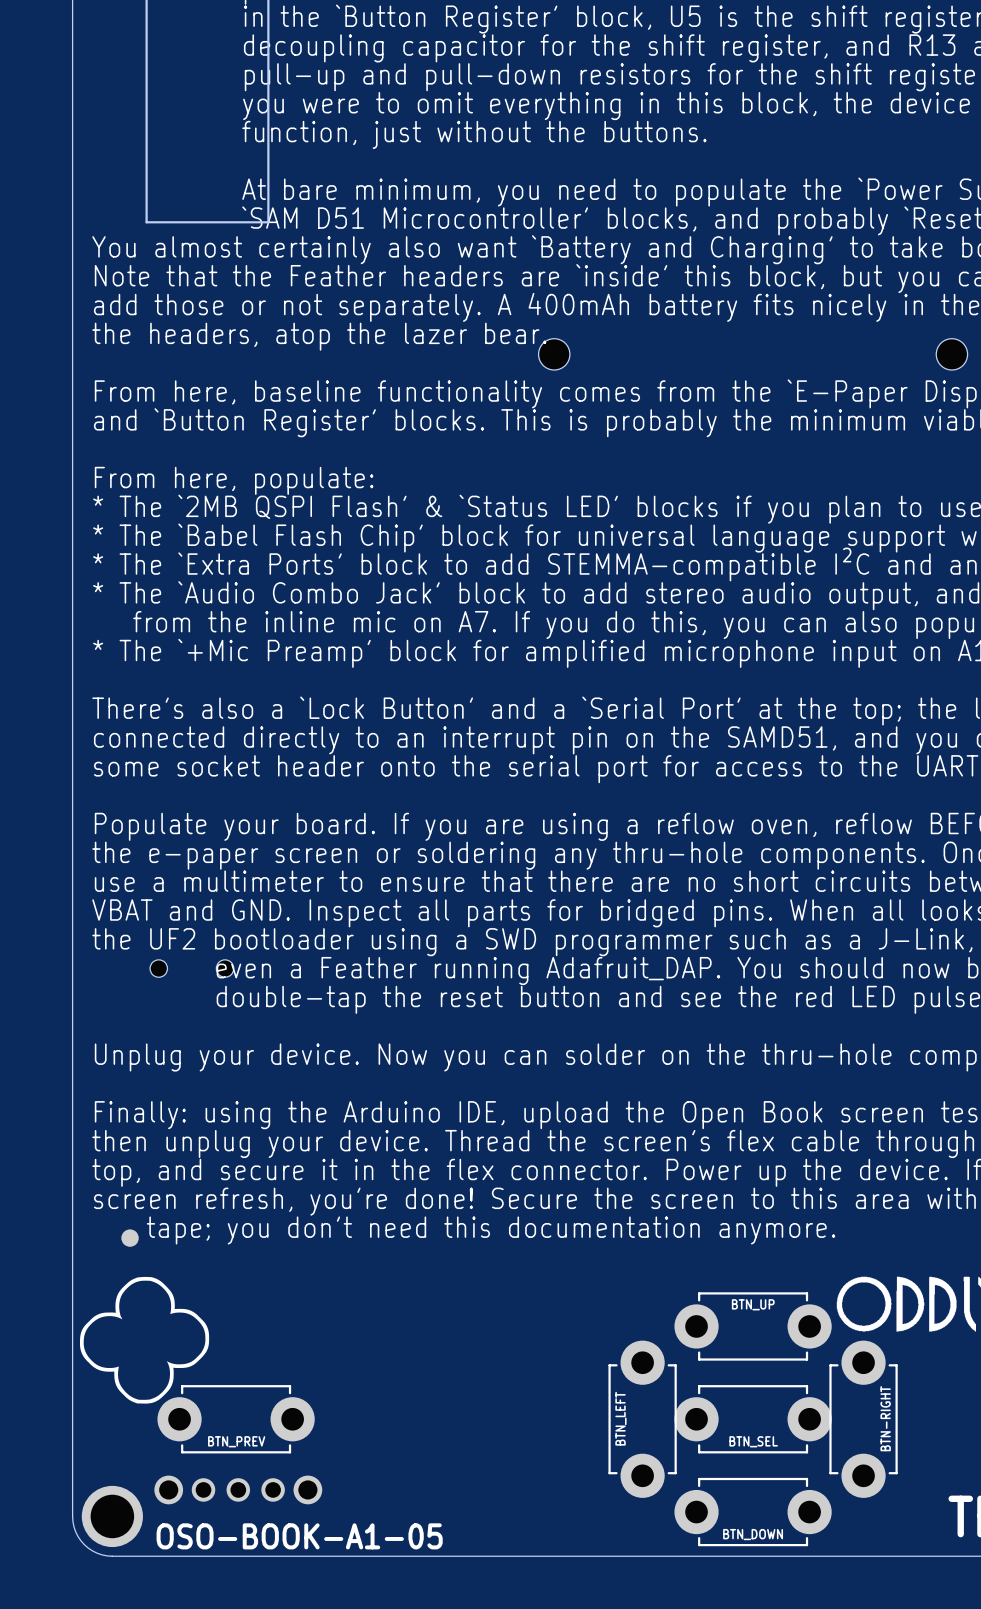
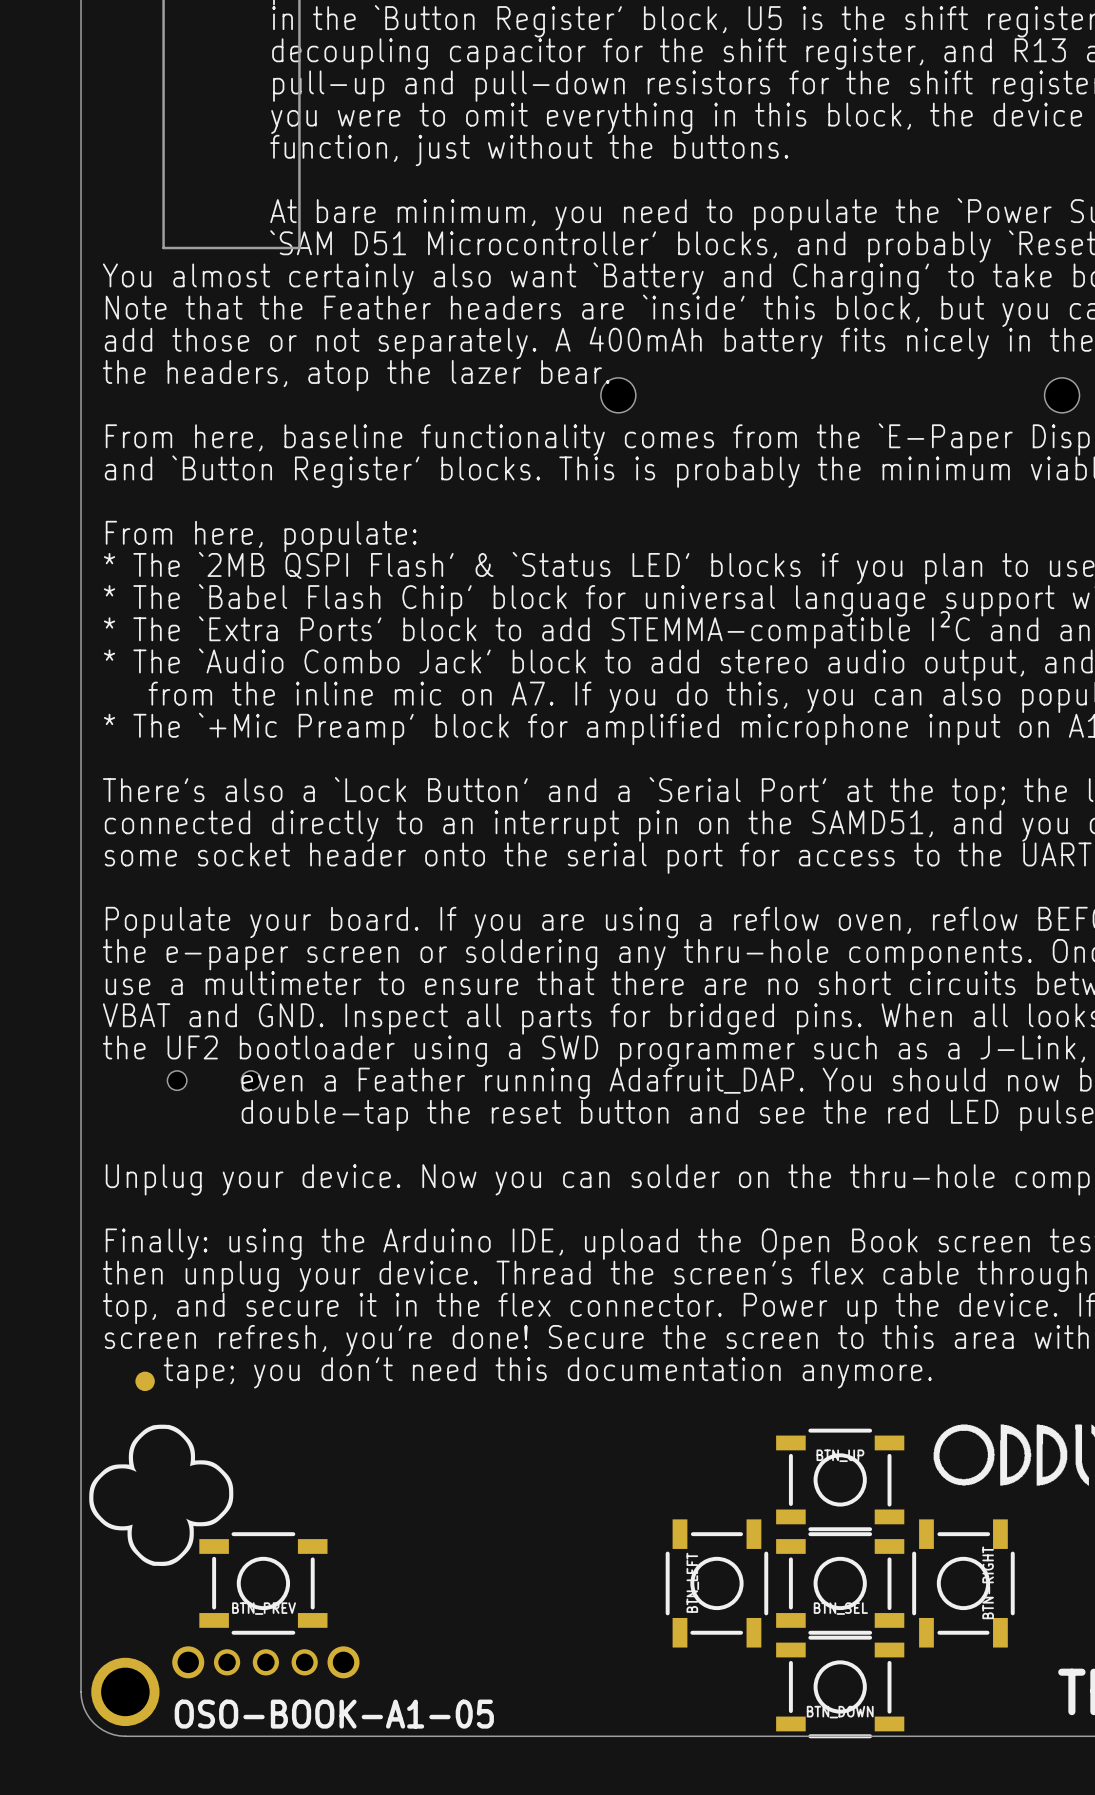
BTN_UP footprint: [674, 1292, 832, 1361] -> [776, 1428, 905, 1532]
BTN_LEFT footprint: [608, 1340, 677, 1498] -> [665, 1519, 769, 1648]
BTN-RIGHT footprint: [829, 1340, 898, 1498] -> [912, 1519, 1015, 1648]
BTN_PREV footprint: [157, 1385, 315, 1454] -> [199, 1532, 328, 1635]
BTN_SEL footprint: [674, 1385, 832, 1454] -> [776, 1532, 905, 1635]
BTN_DOWN footprint: [674, 1477, 832, 1547] -> [776, 1635, 905, 1739]

